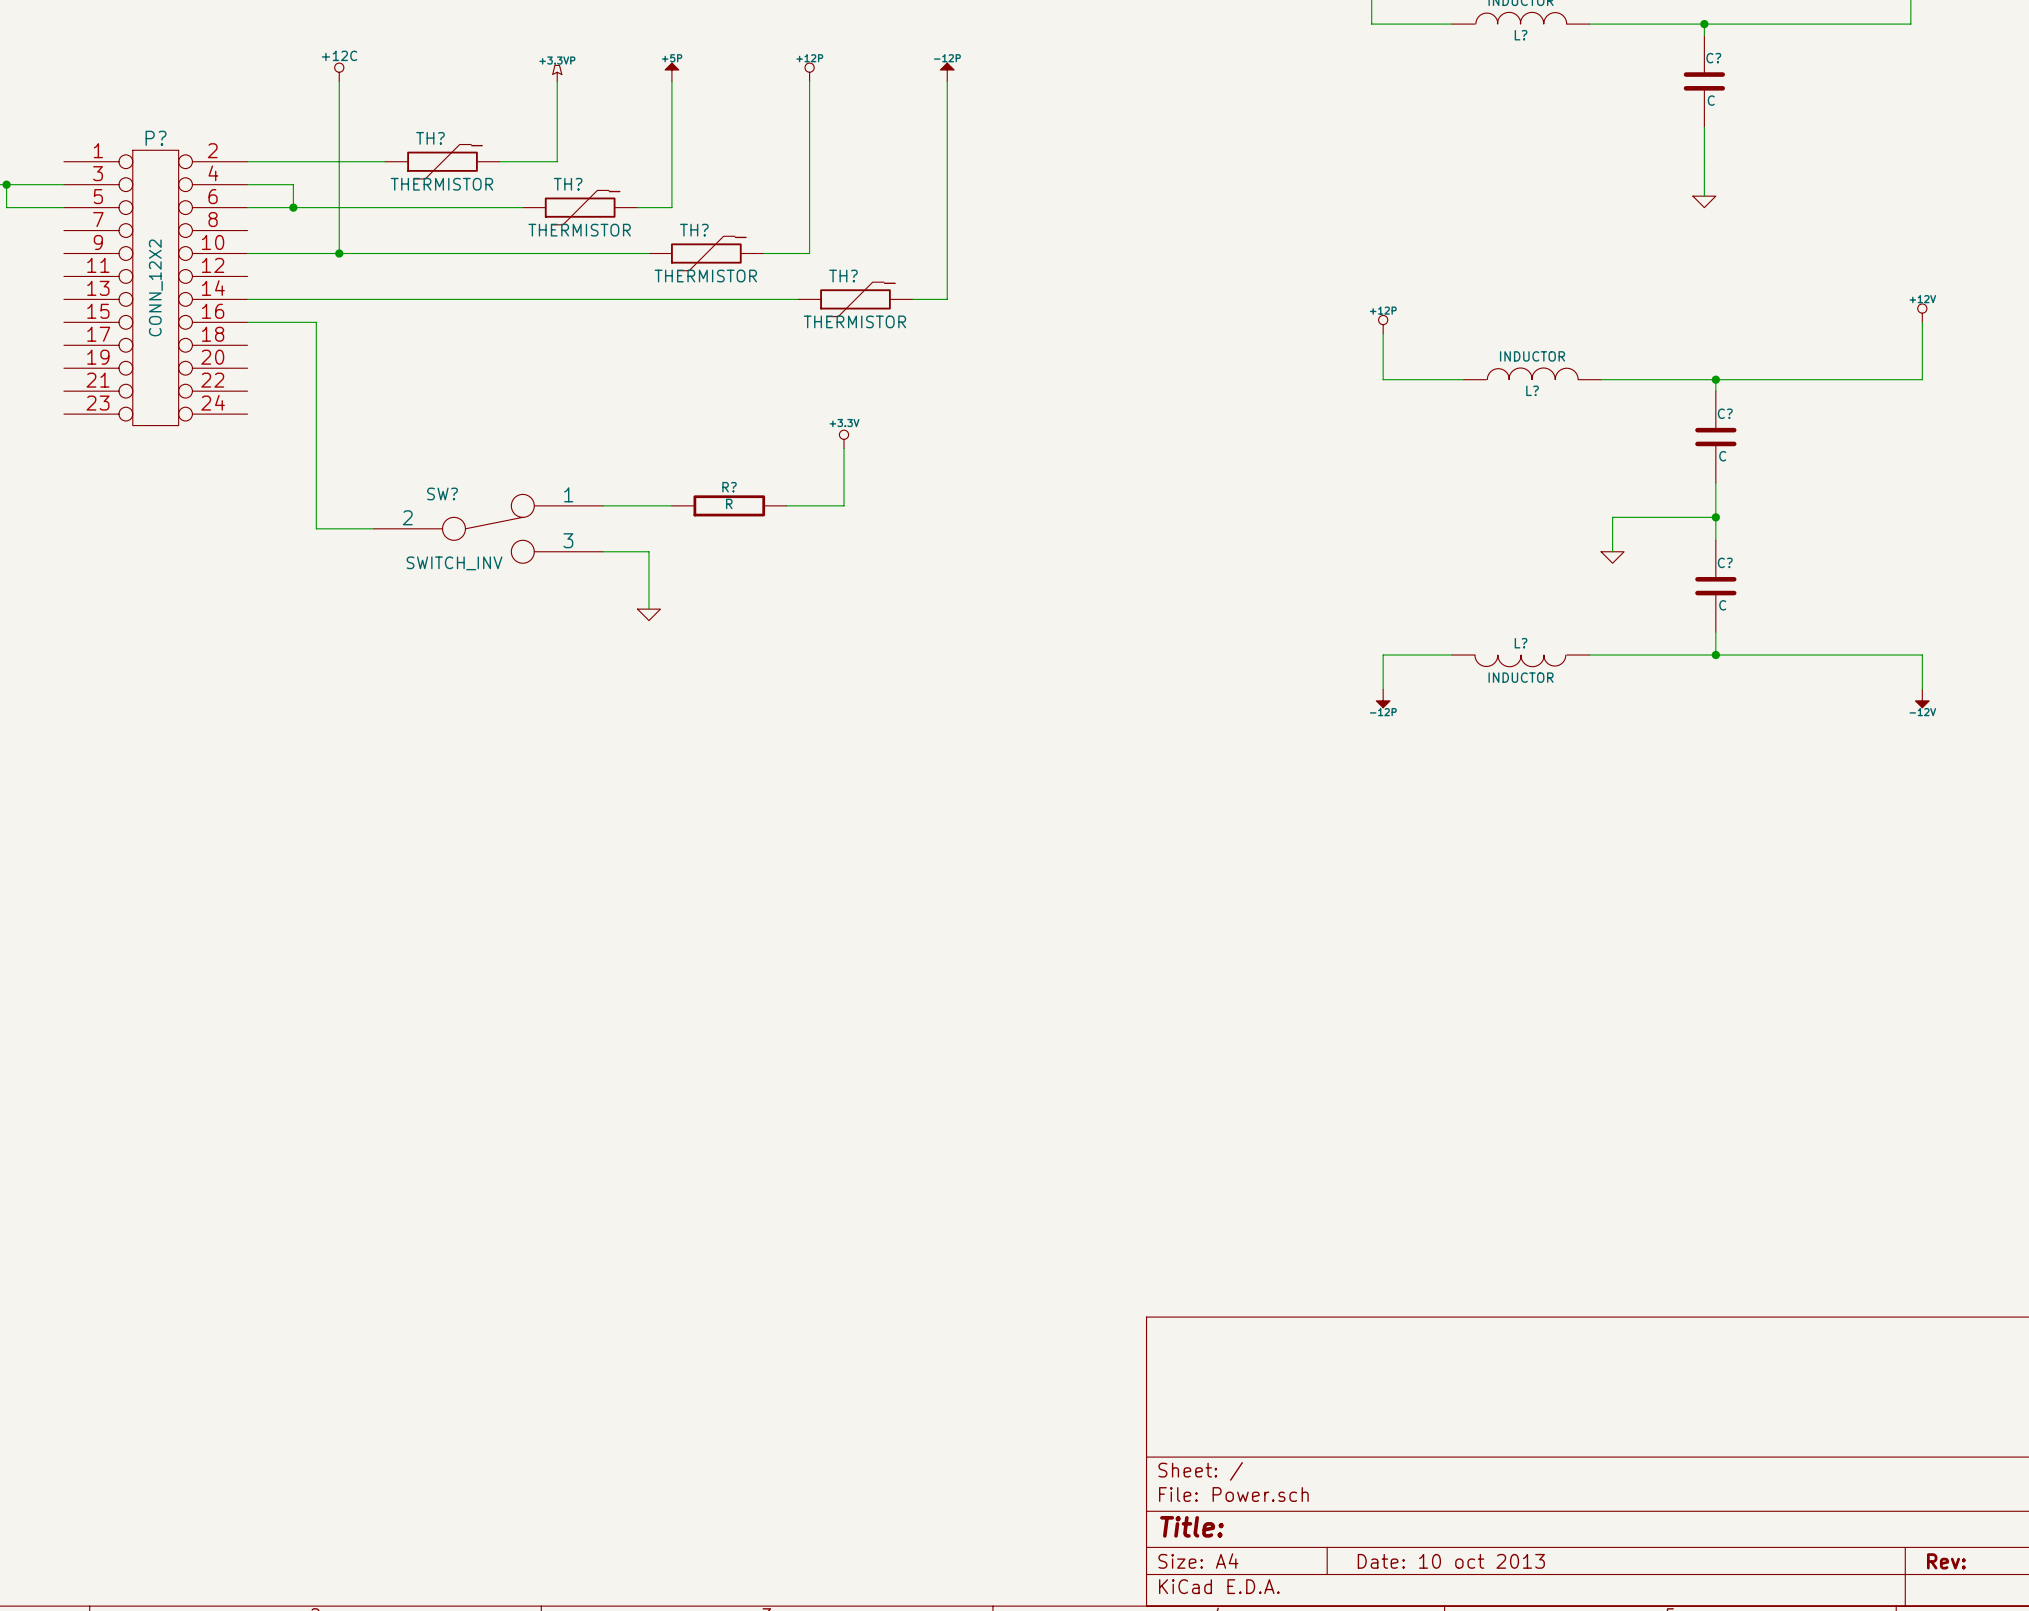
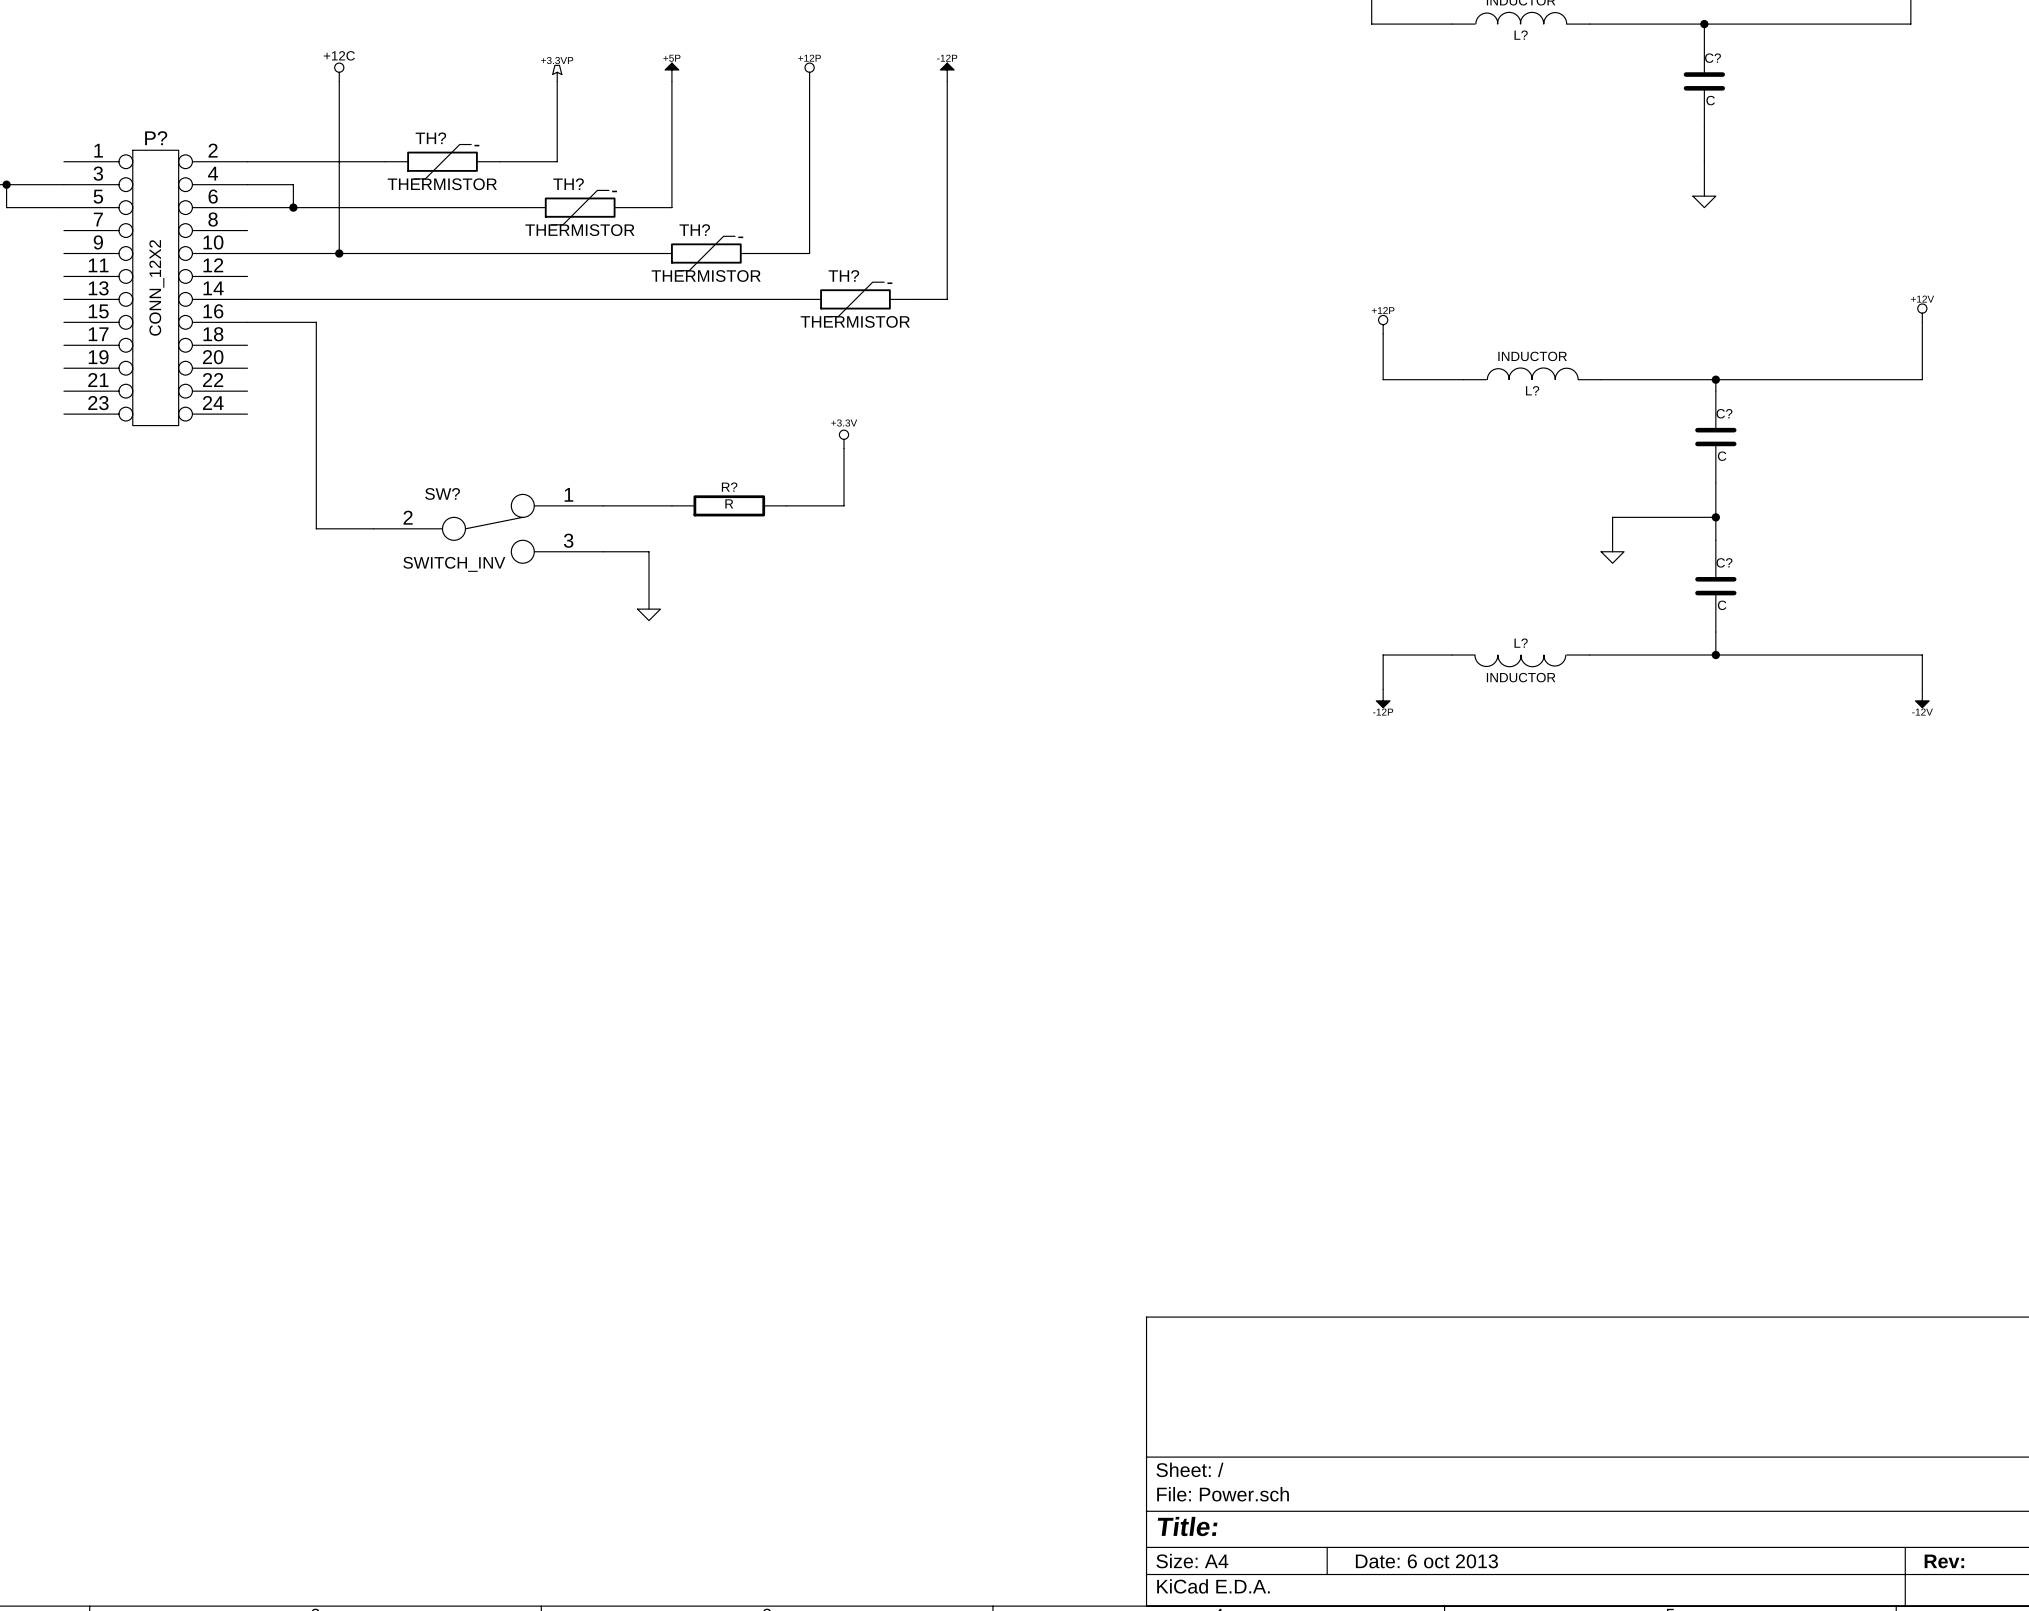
title block: Date: 10 oct 2013 (1451, 1561) -> Date: 6 oct 2013 (1426, 1561)

